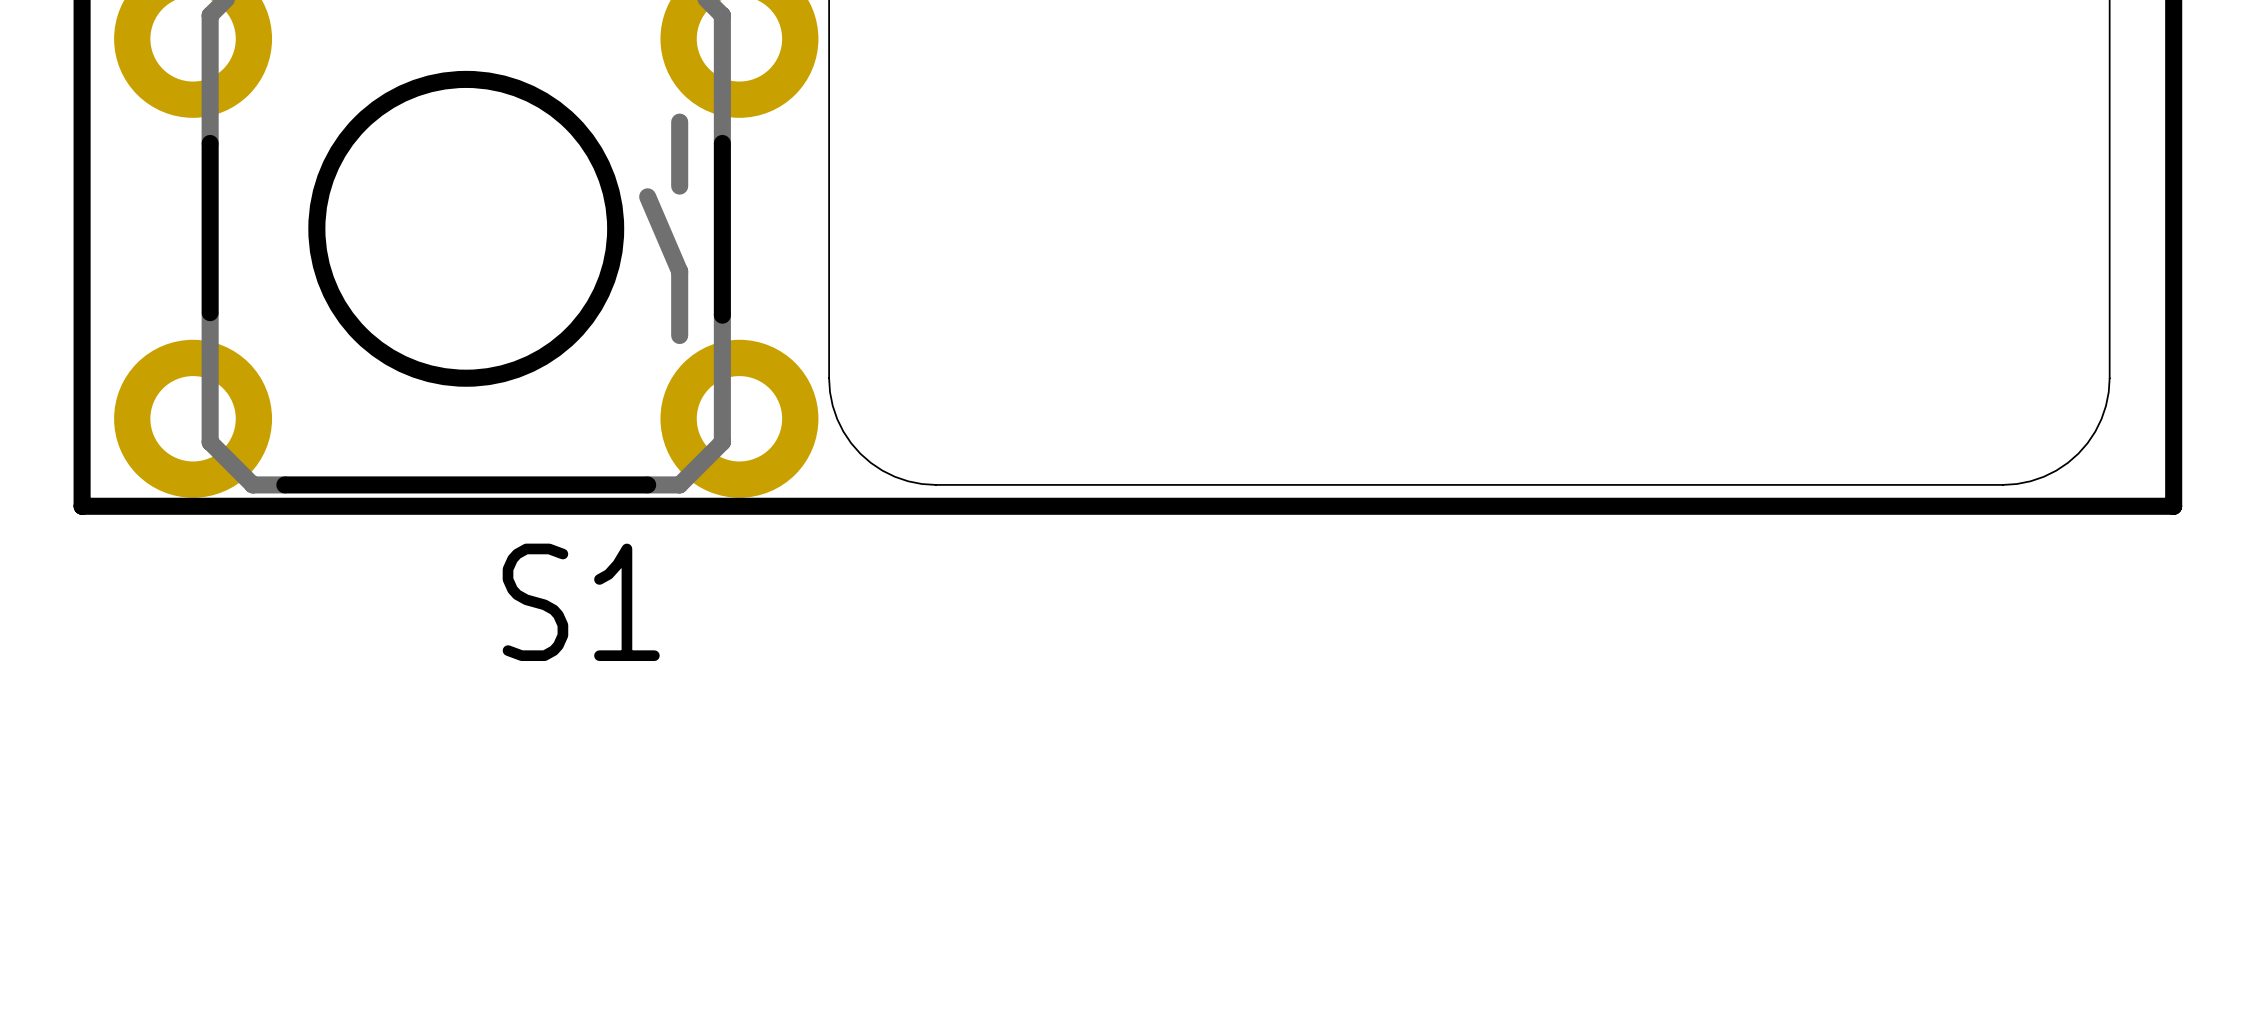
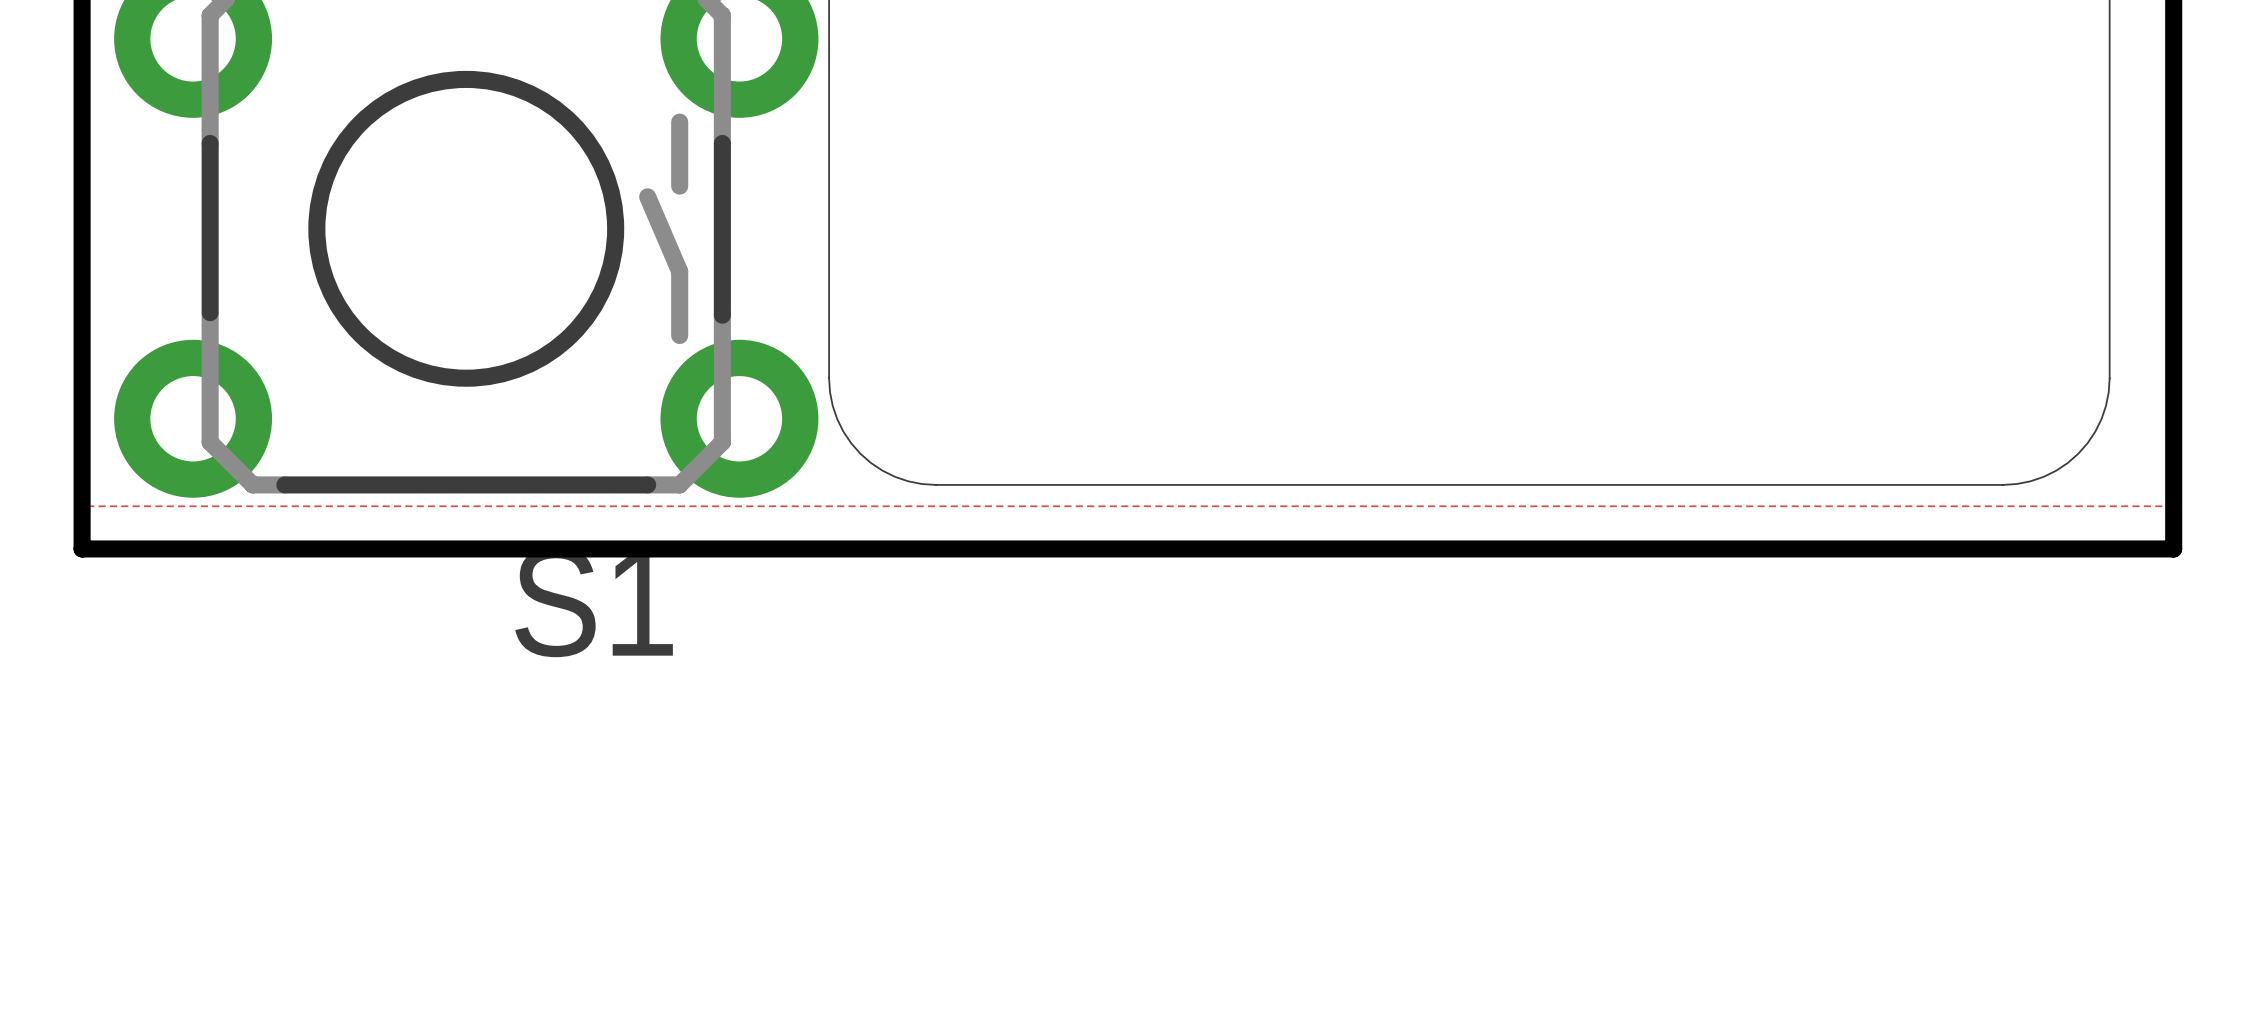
board edge: (82, 506) (2173, 506) -> (82, 506) (82, 548) (2173, 548) (2173, 506)

